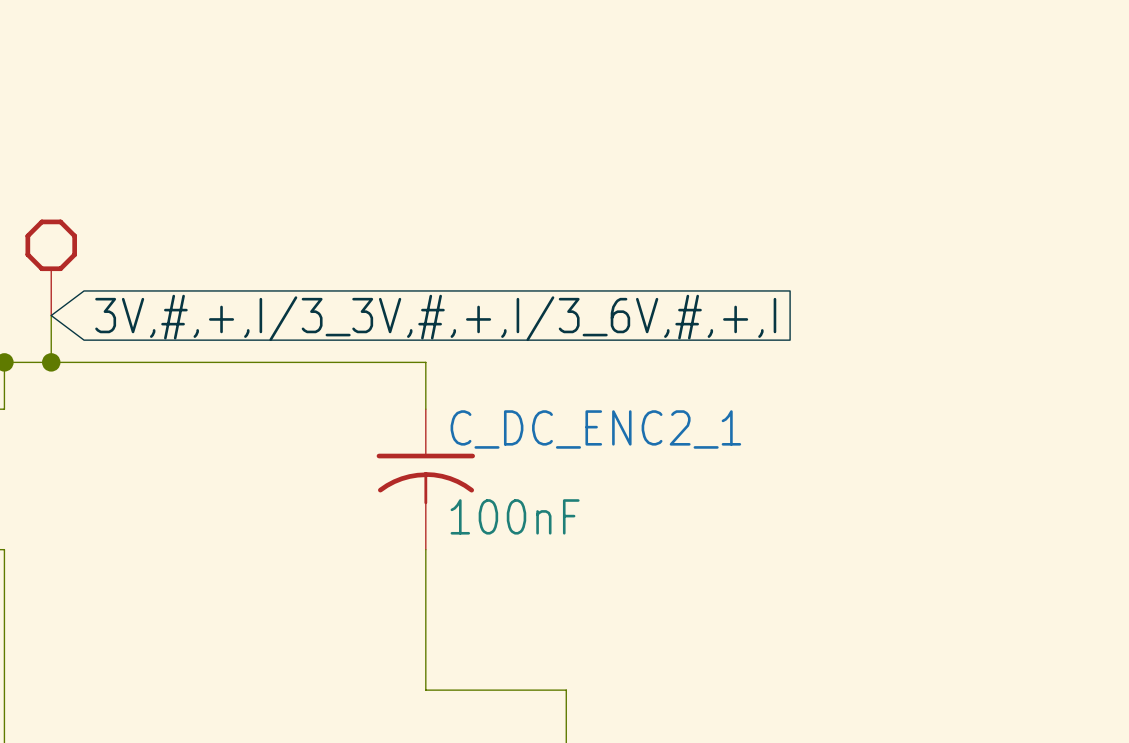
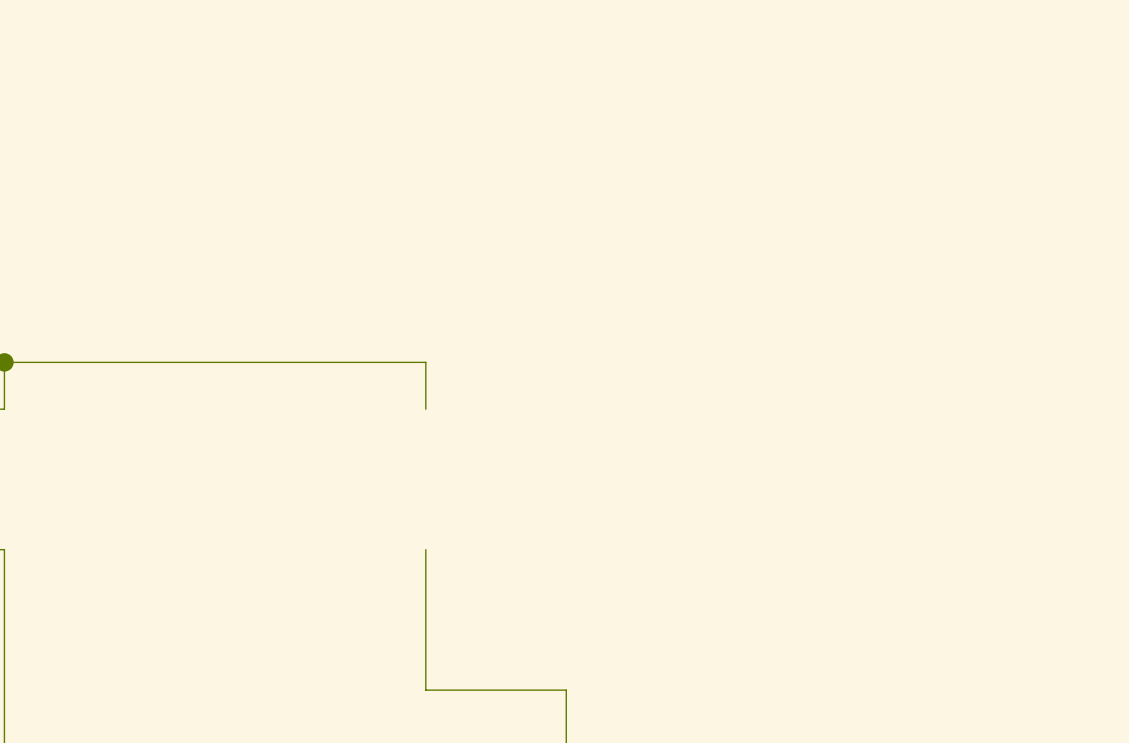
power symbol: (51, 267) -> none
wire: (51, 315) (51, 362) -> none
global label: 3V,#,+,I/3_3V,#,+,I/3_6V,#,+,I (435, 317) -> none
junction: (51, 362) -> none
C_DC_ENC2_1: 100nF (425, 479) -> none

